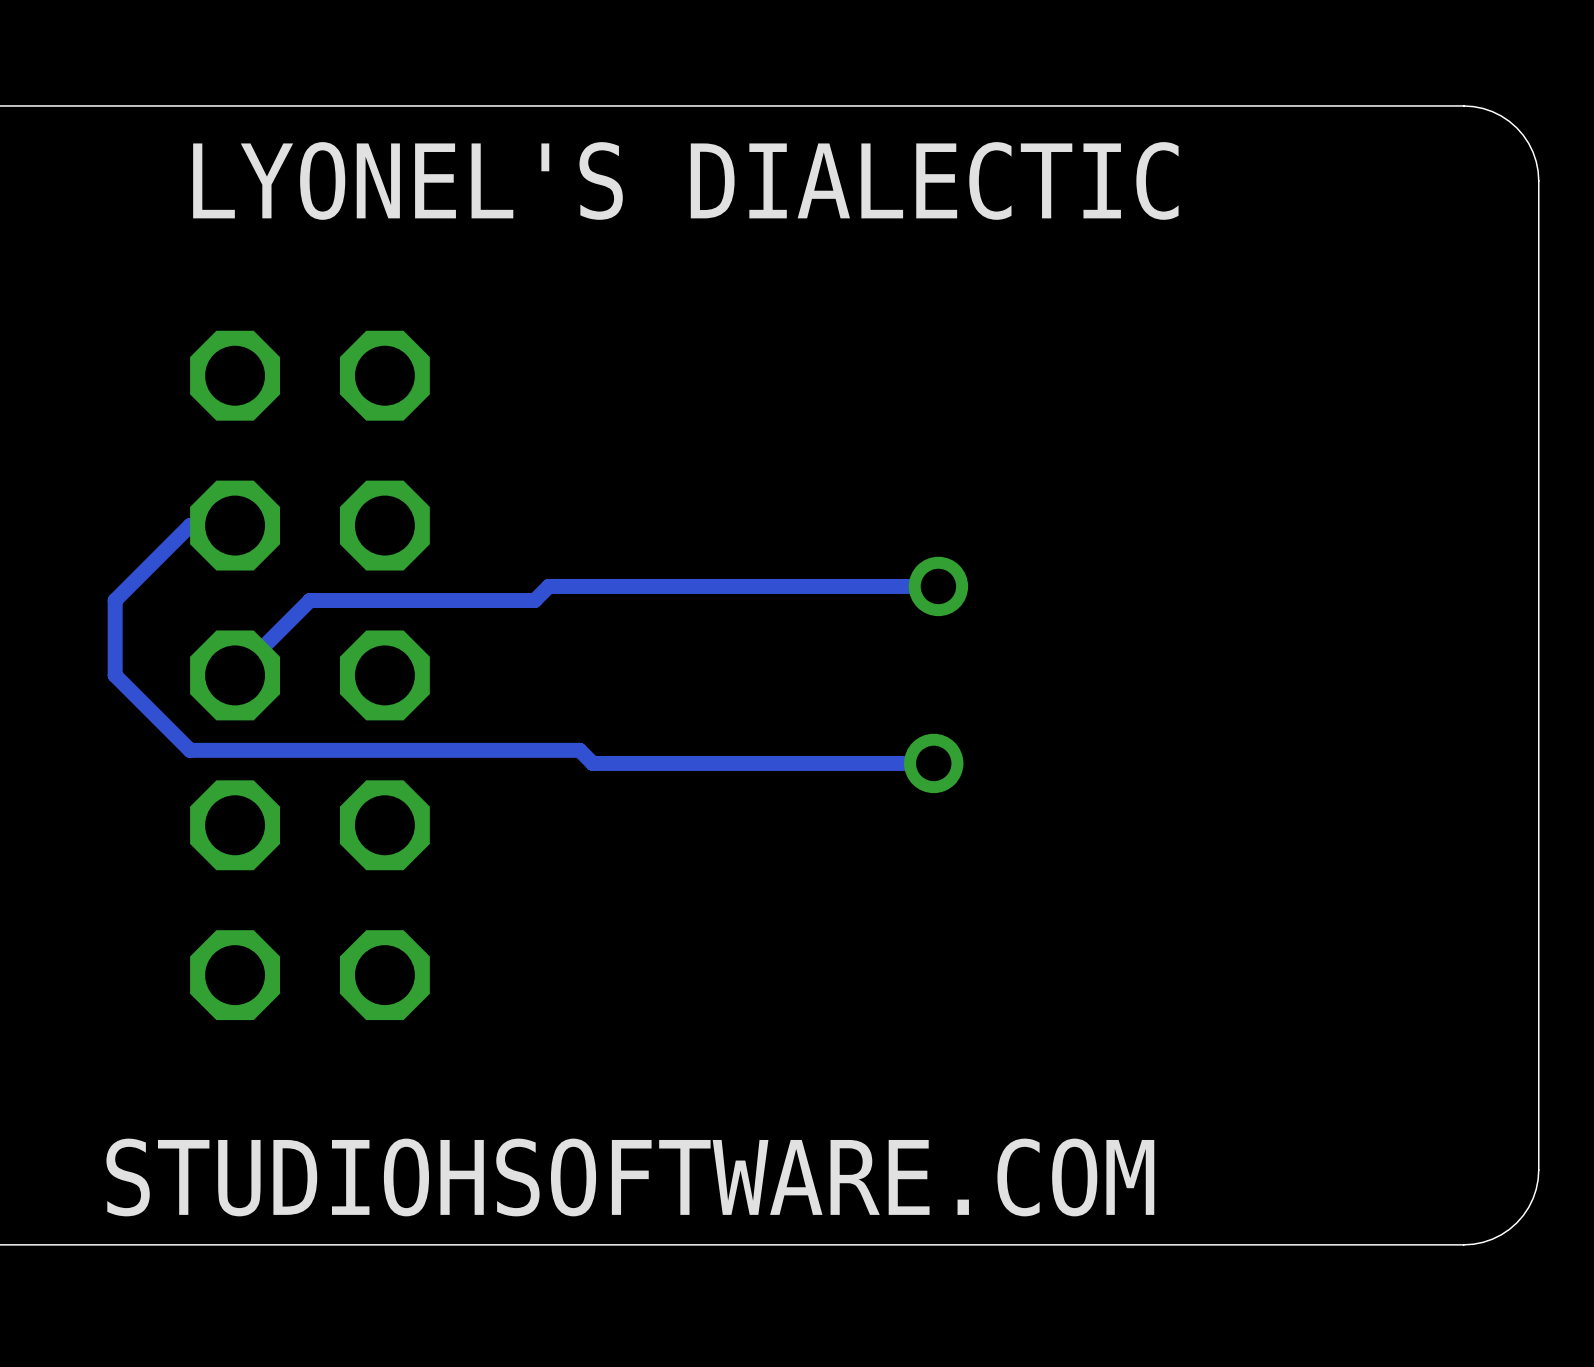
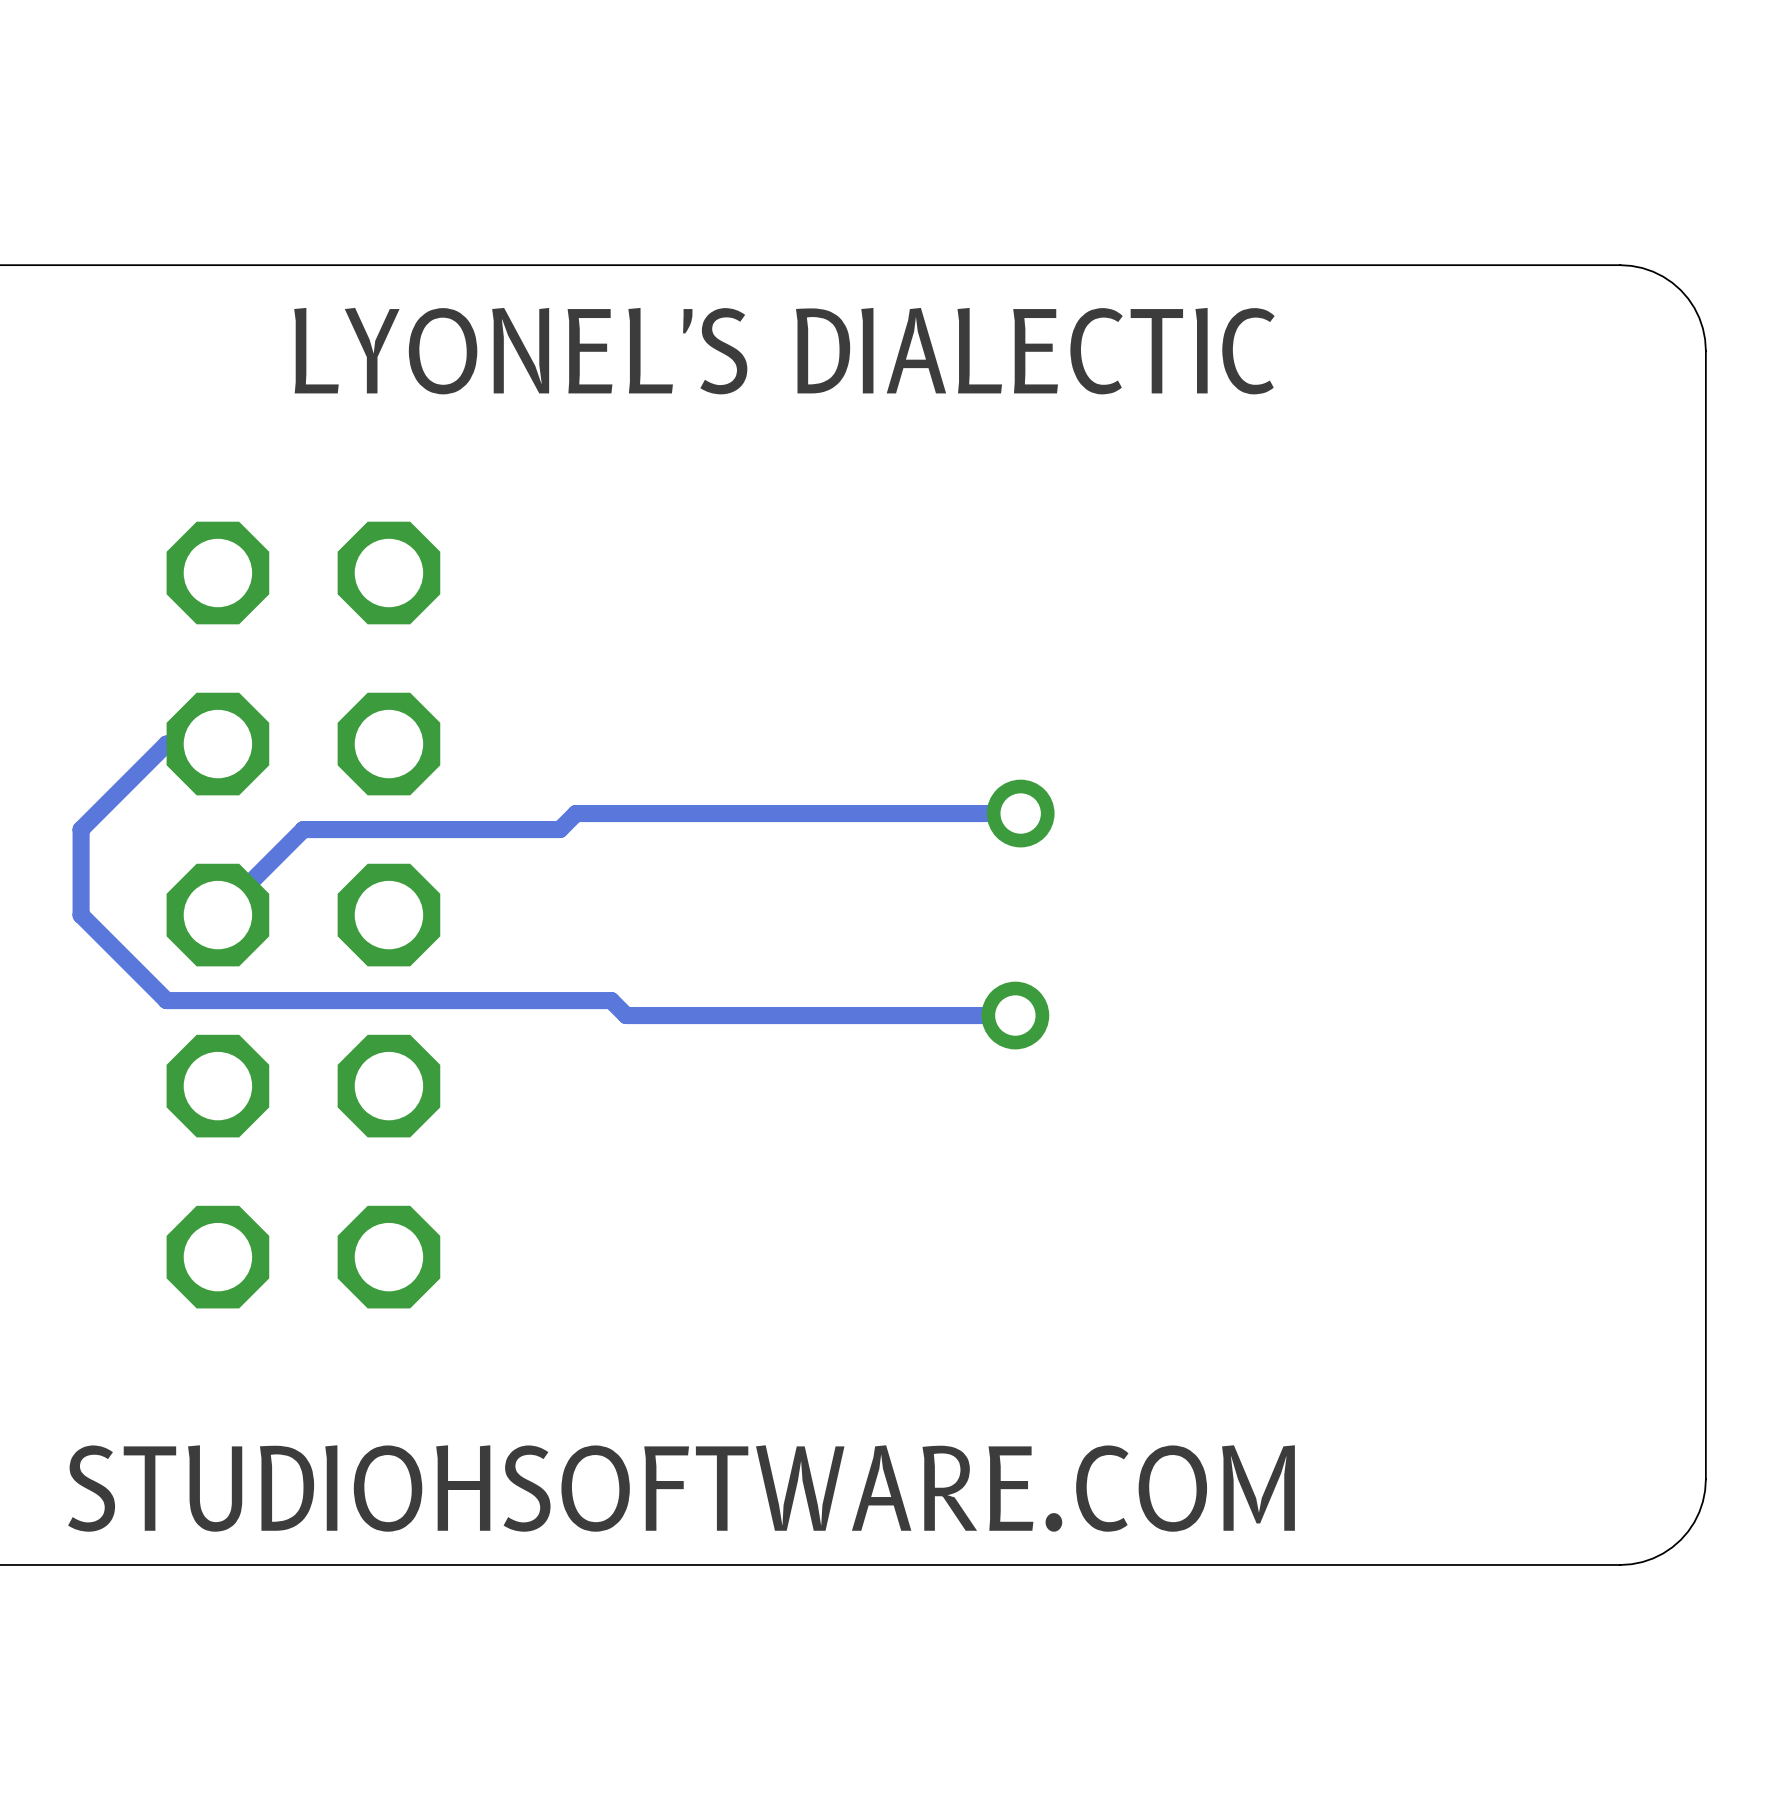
text position: LYONEL'S DIALECTIC (685, 180) -> LYONEL'S DIALECTIC (784, 351)

